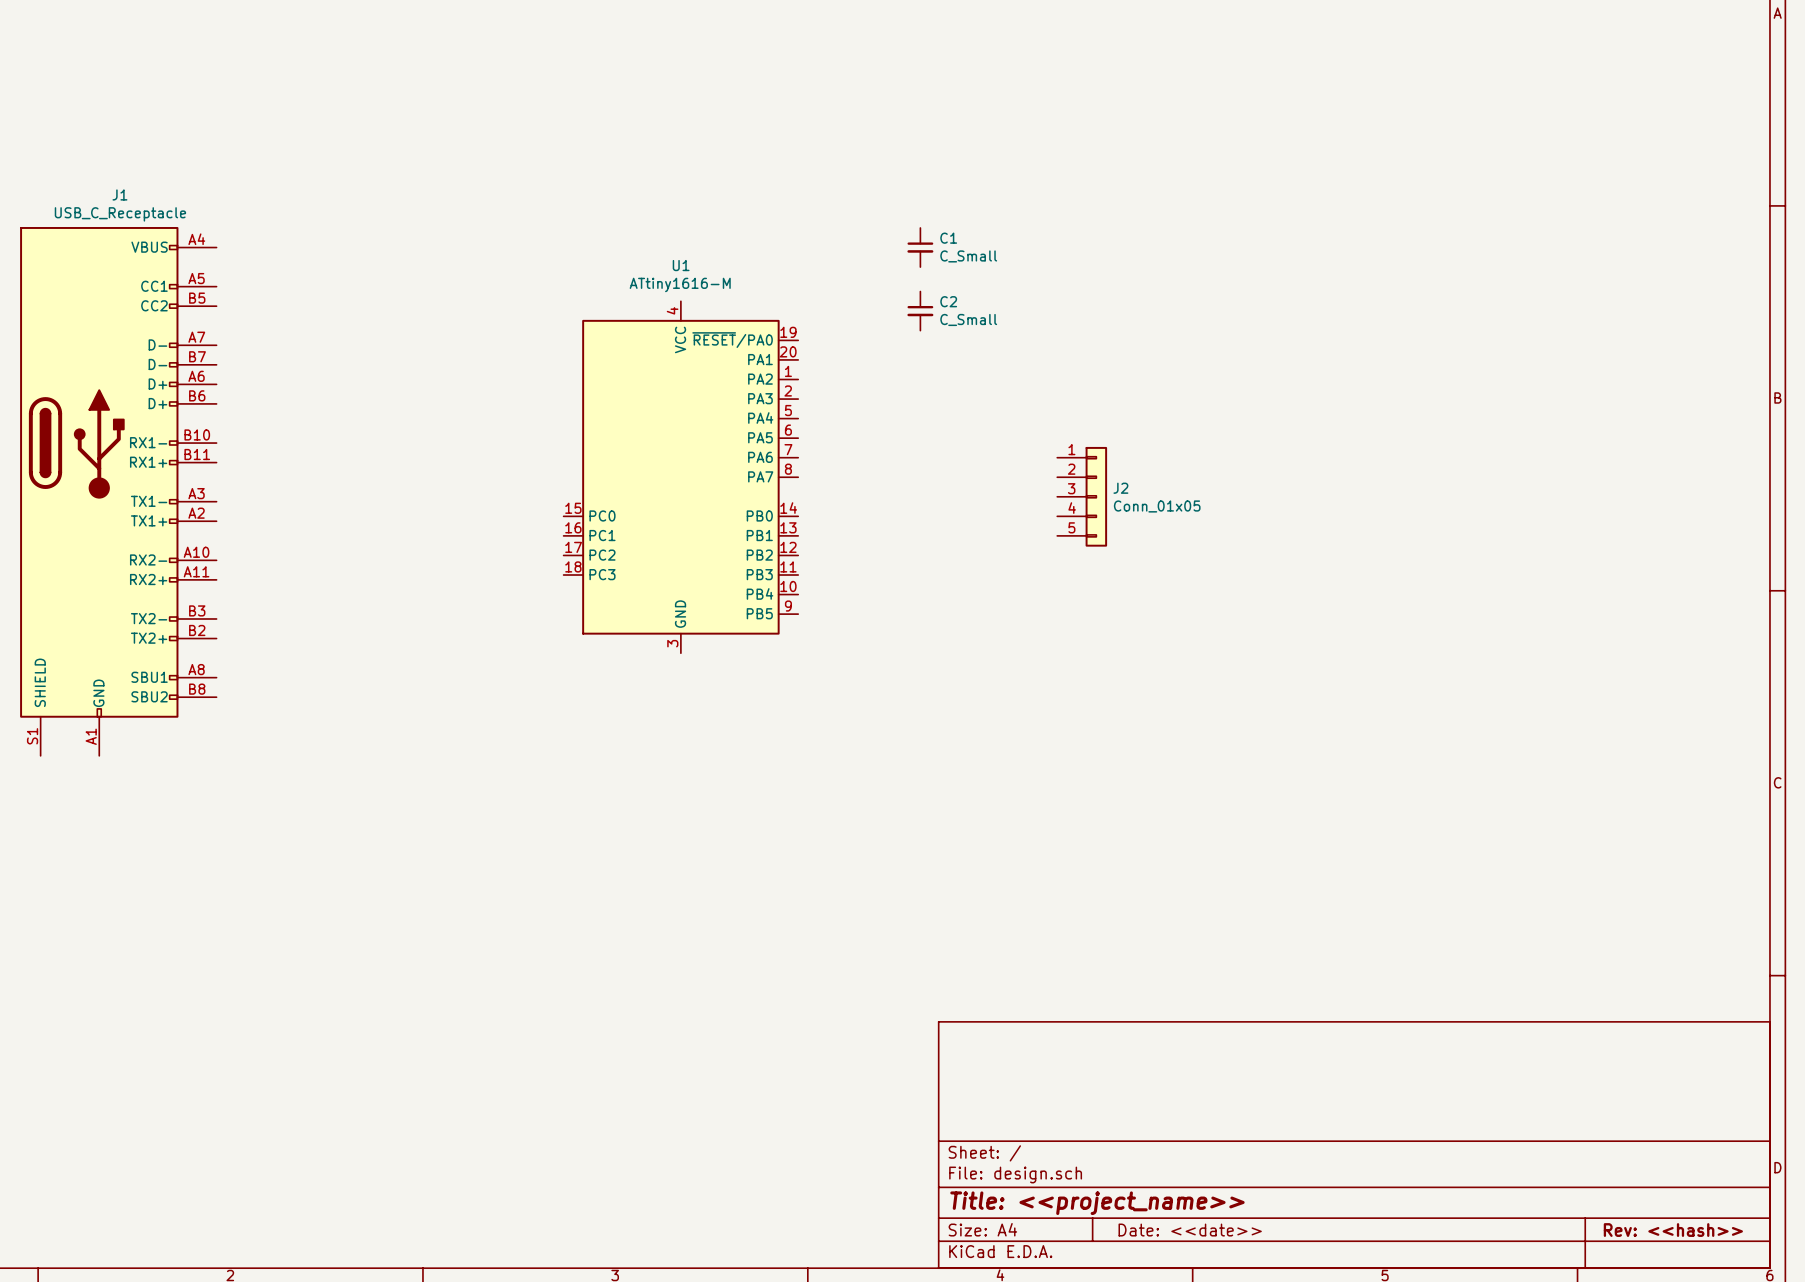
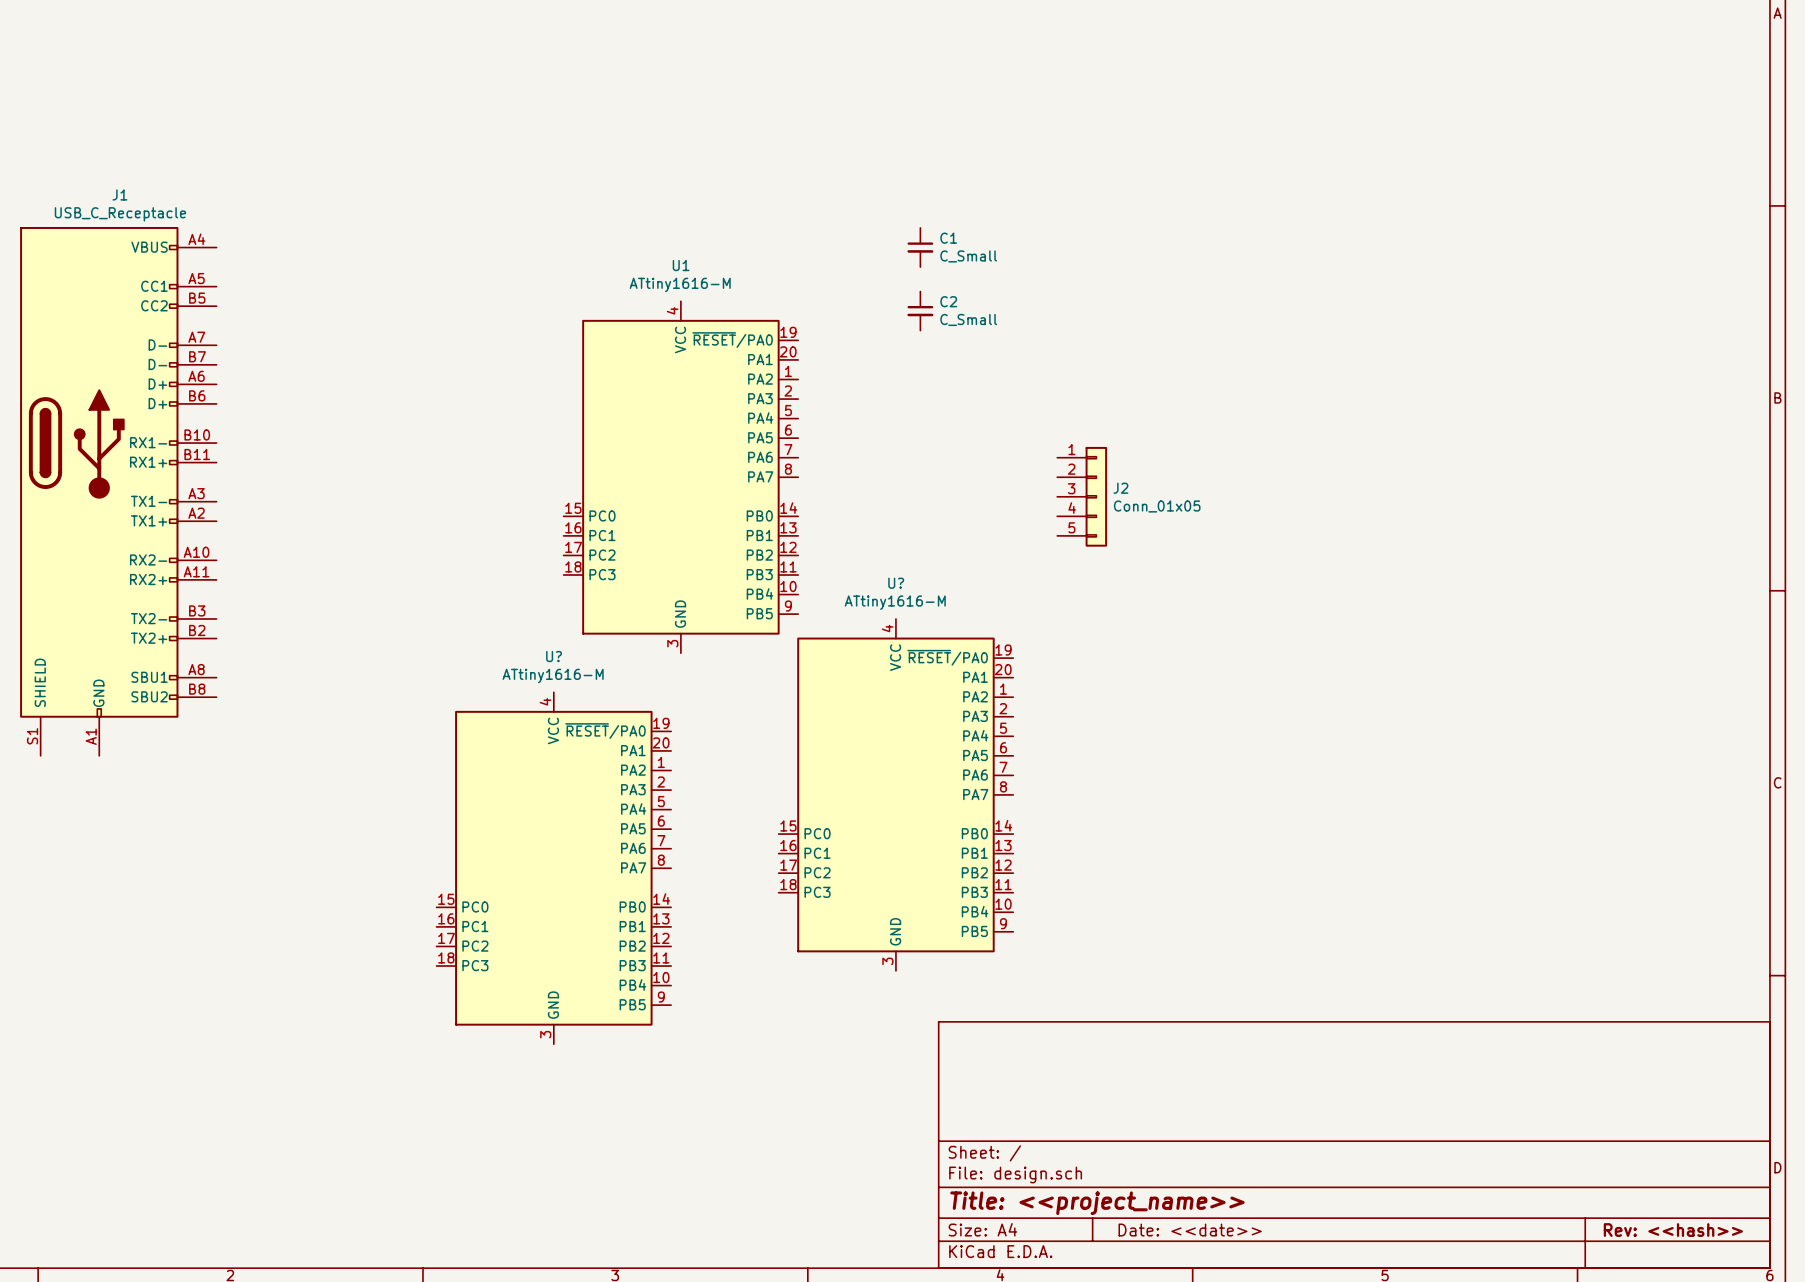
U?: none -> ATtiny1616-M (895, 794)
U?: none -> ATtiny1616-M (553, 868)

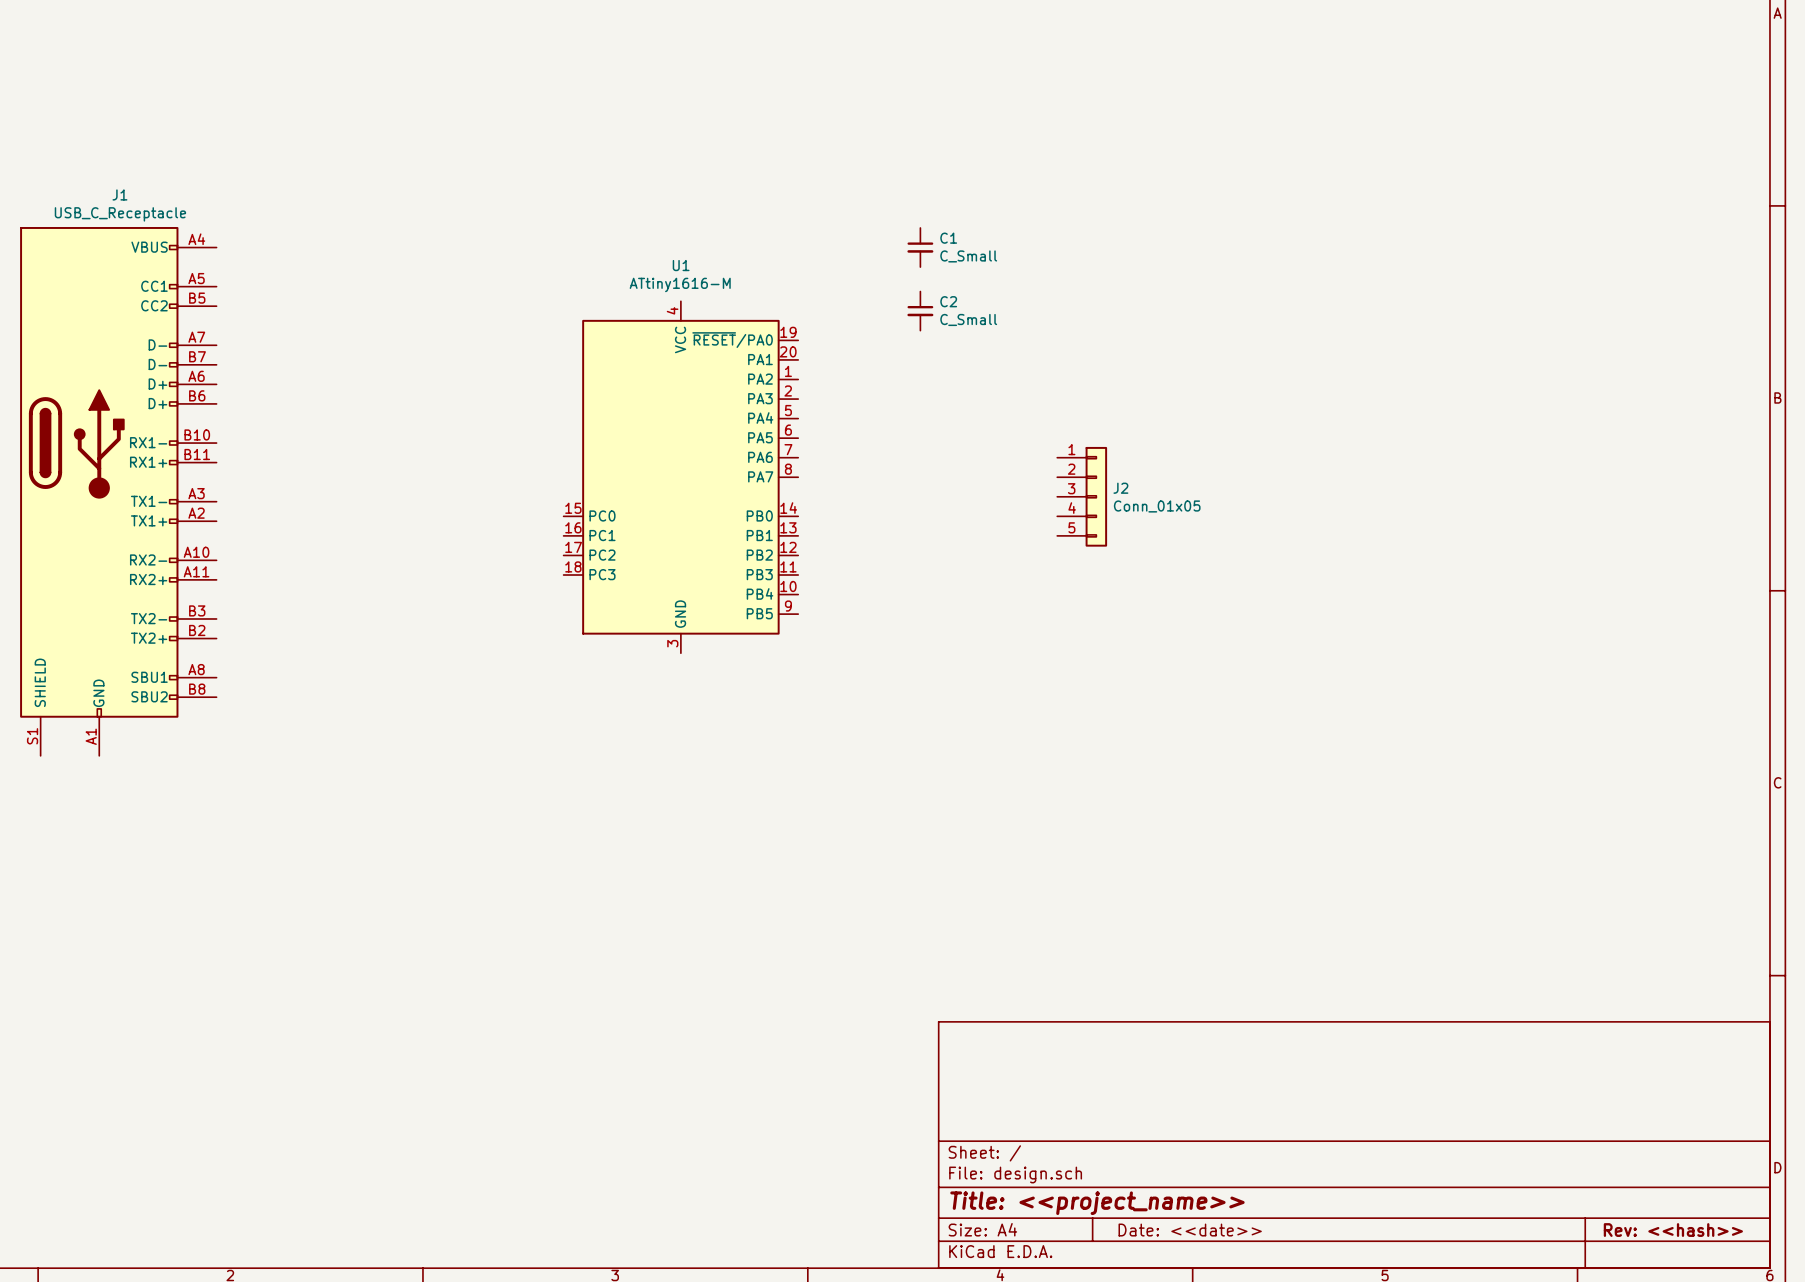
U?: ATtiny1616-M (895, 794) -> none
U?: ATtiny1616-M (553, 868) -> none

